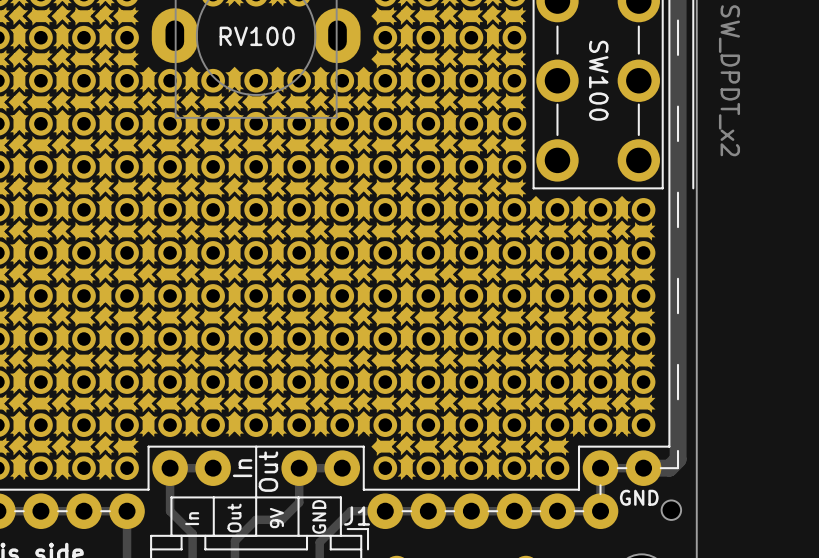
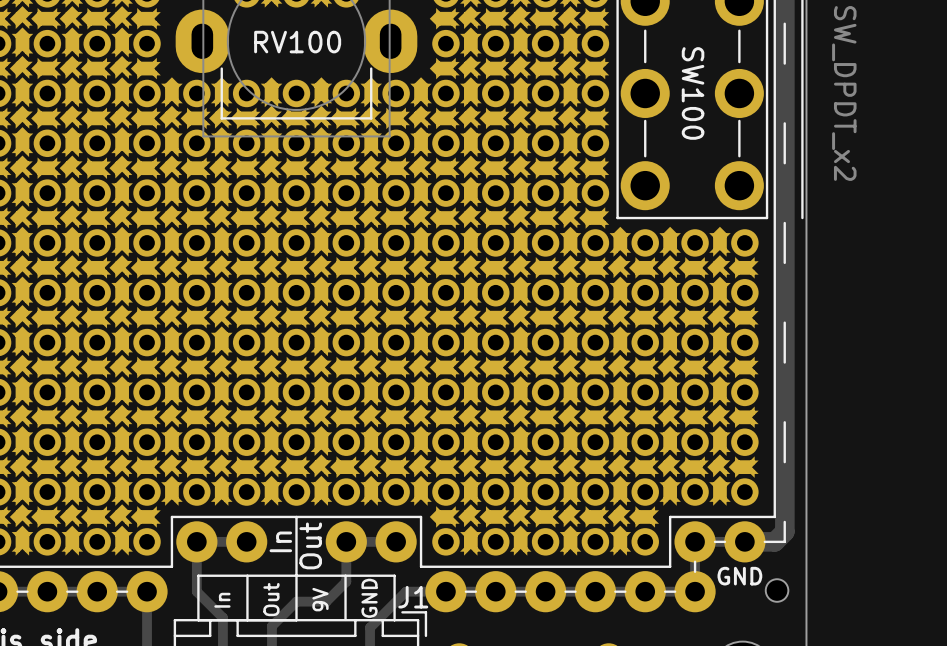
line: none -> (371, 68) (371, 118) (221, 118) (221, 68)

